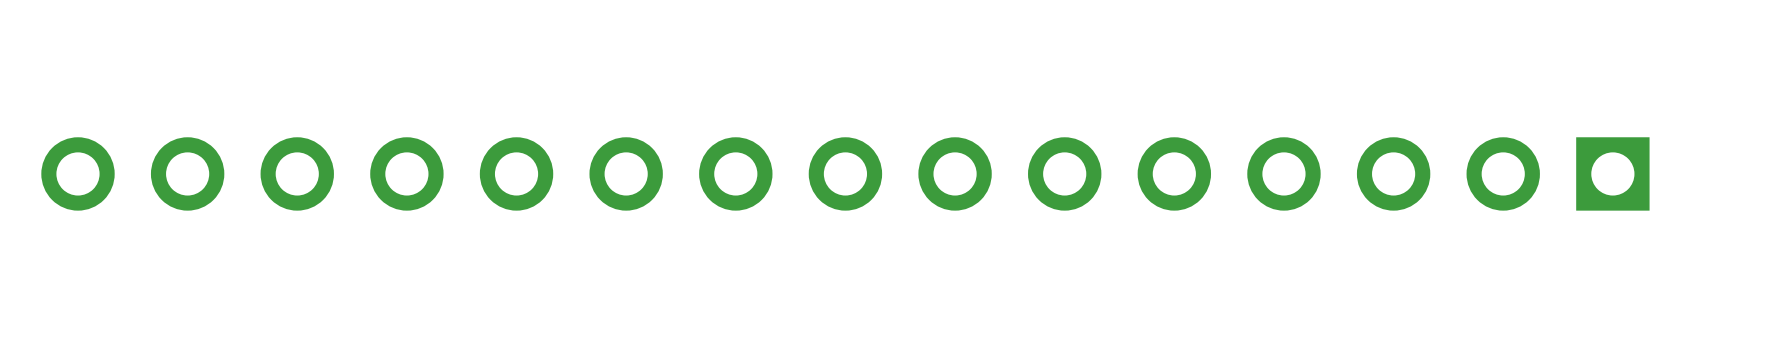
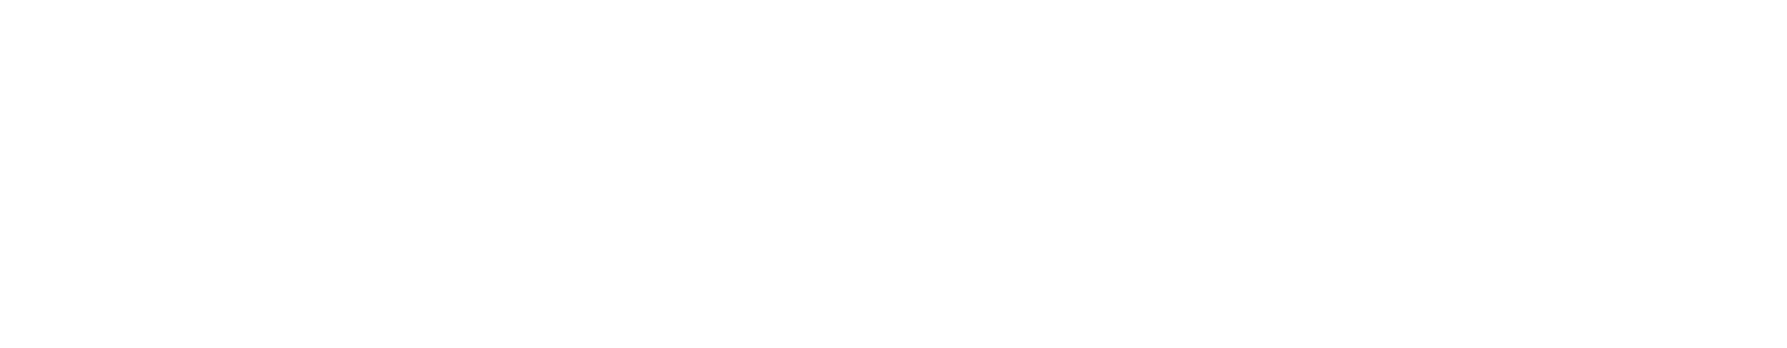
part: (845, 173) -> none

